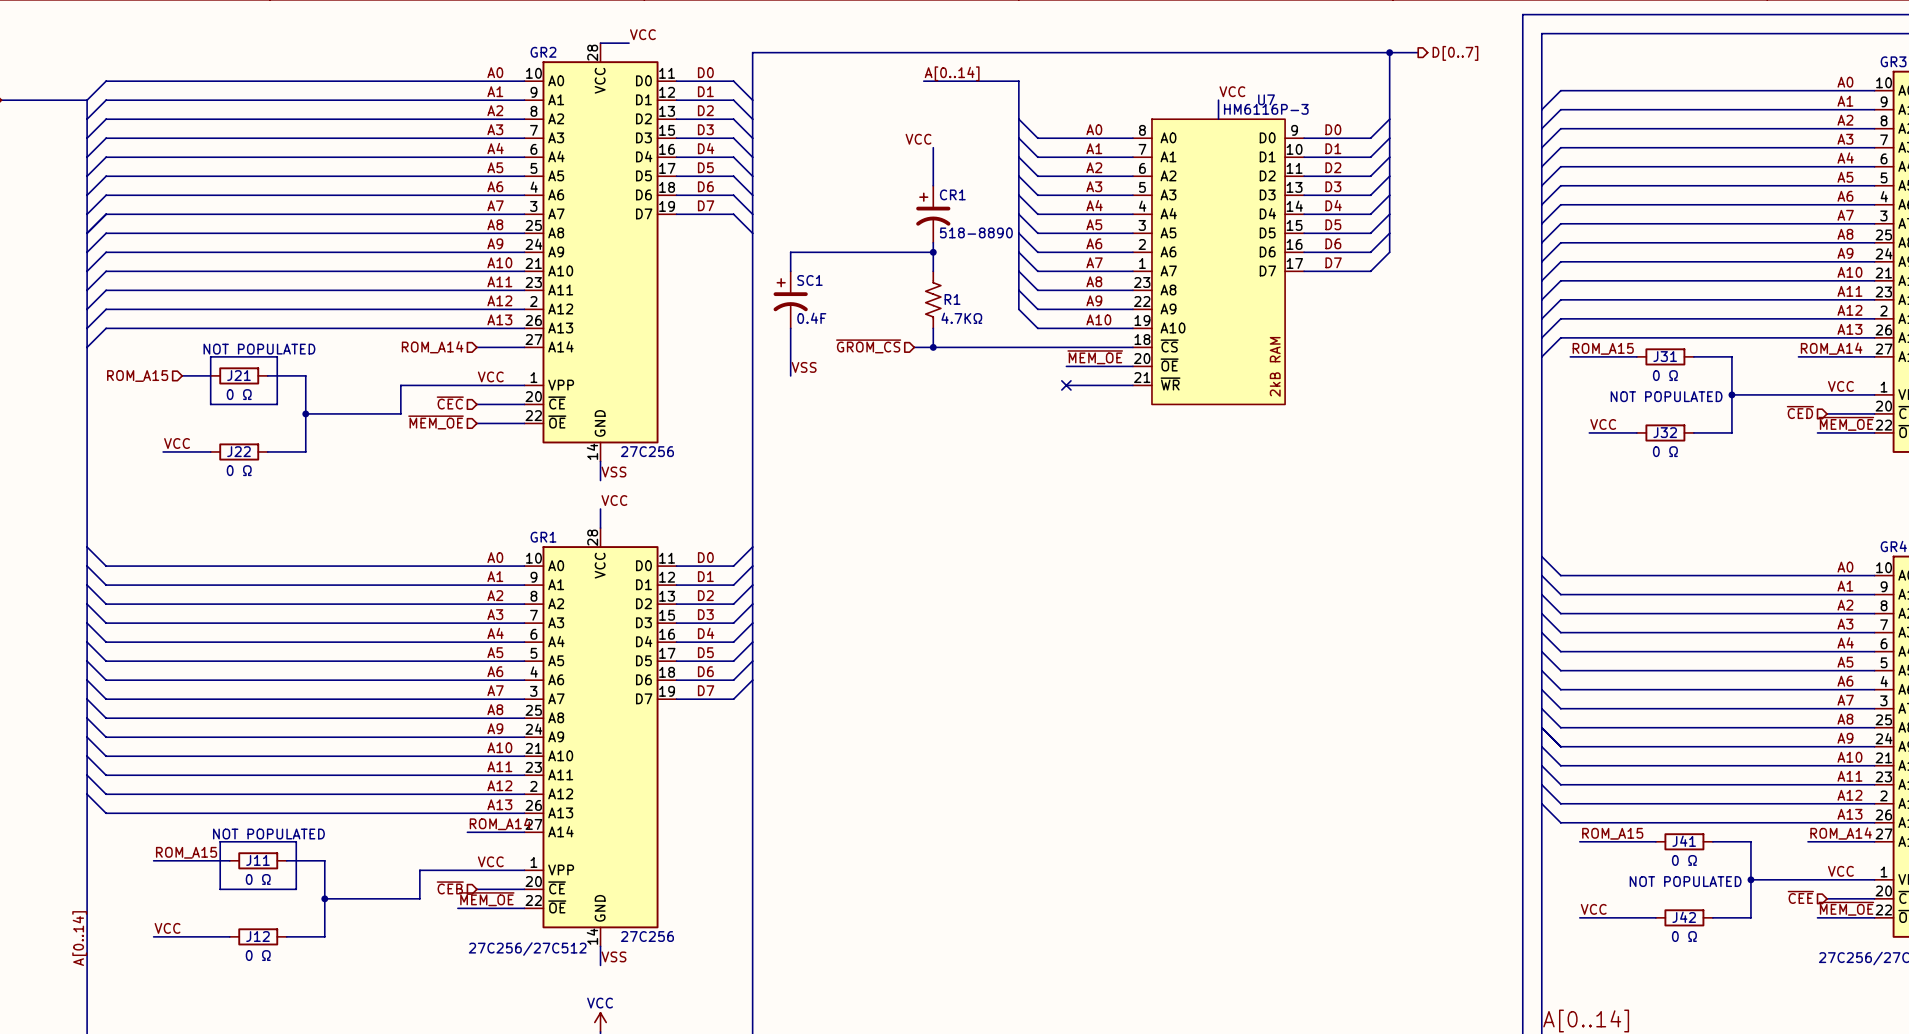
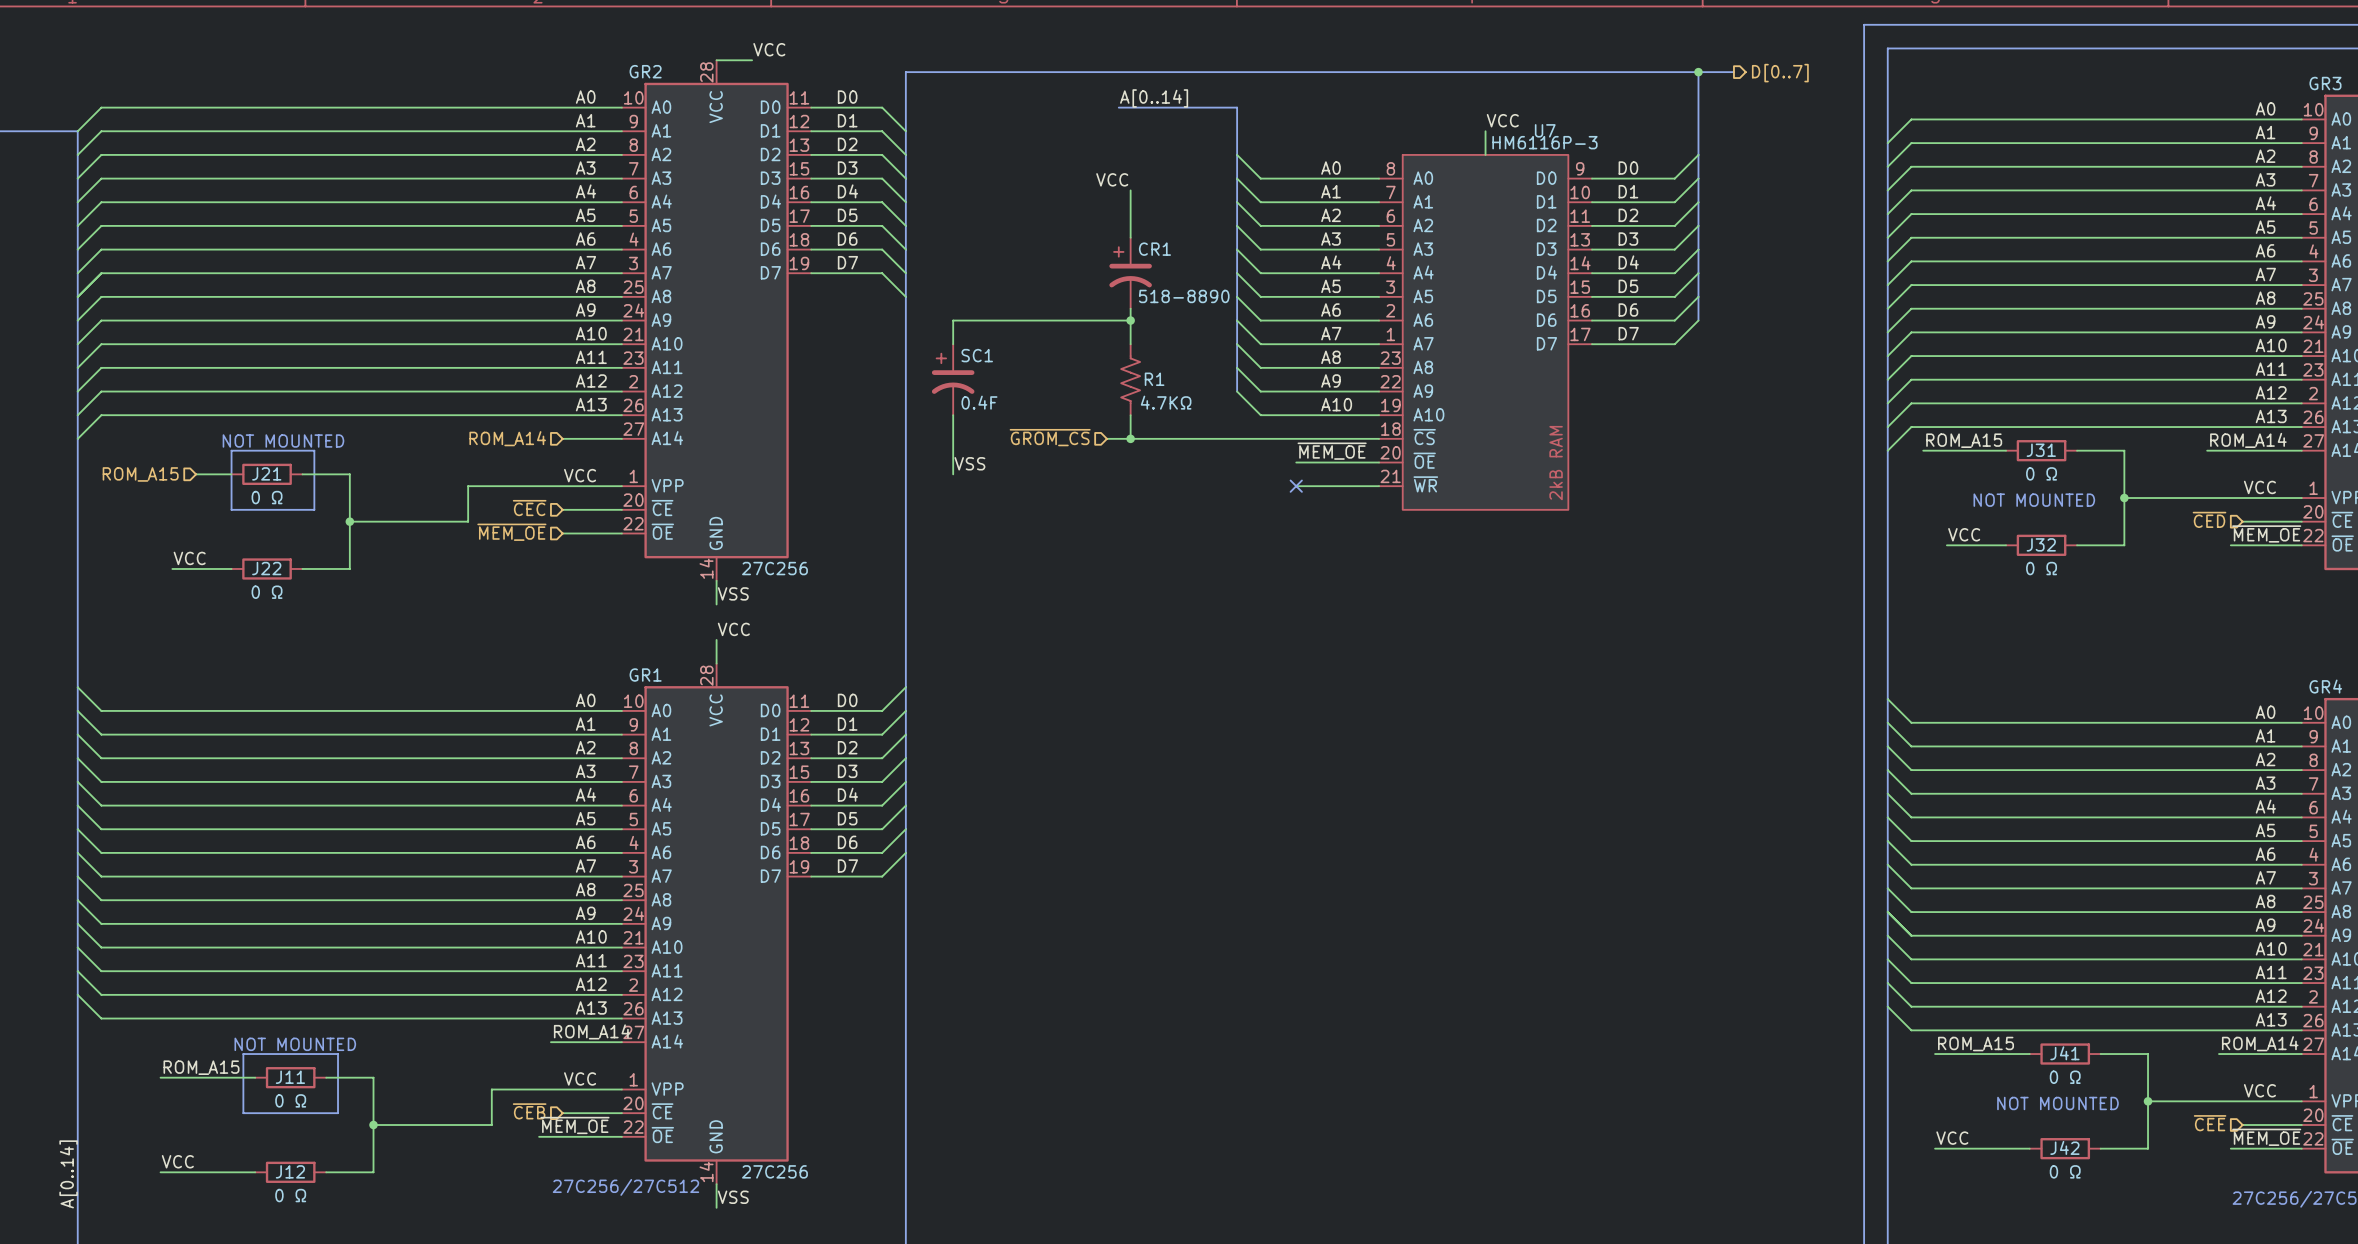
text: NOT POPULATED (259, 349) -> NOT MOUNTED (283, 440)
text: NOT POPULATED (1666, 396) -> NOT MOUNTED (2034, 500)
text: NOT POPULATED (268, 834) -> NOT MOUNTED (295, 1044)
text: NOT POPULATED (1685, 881) -> NOT MOUNTED (2057, 1103)

